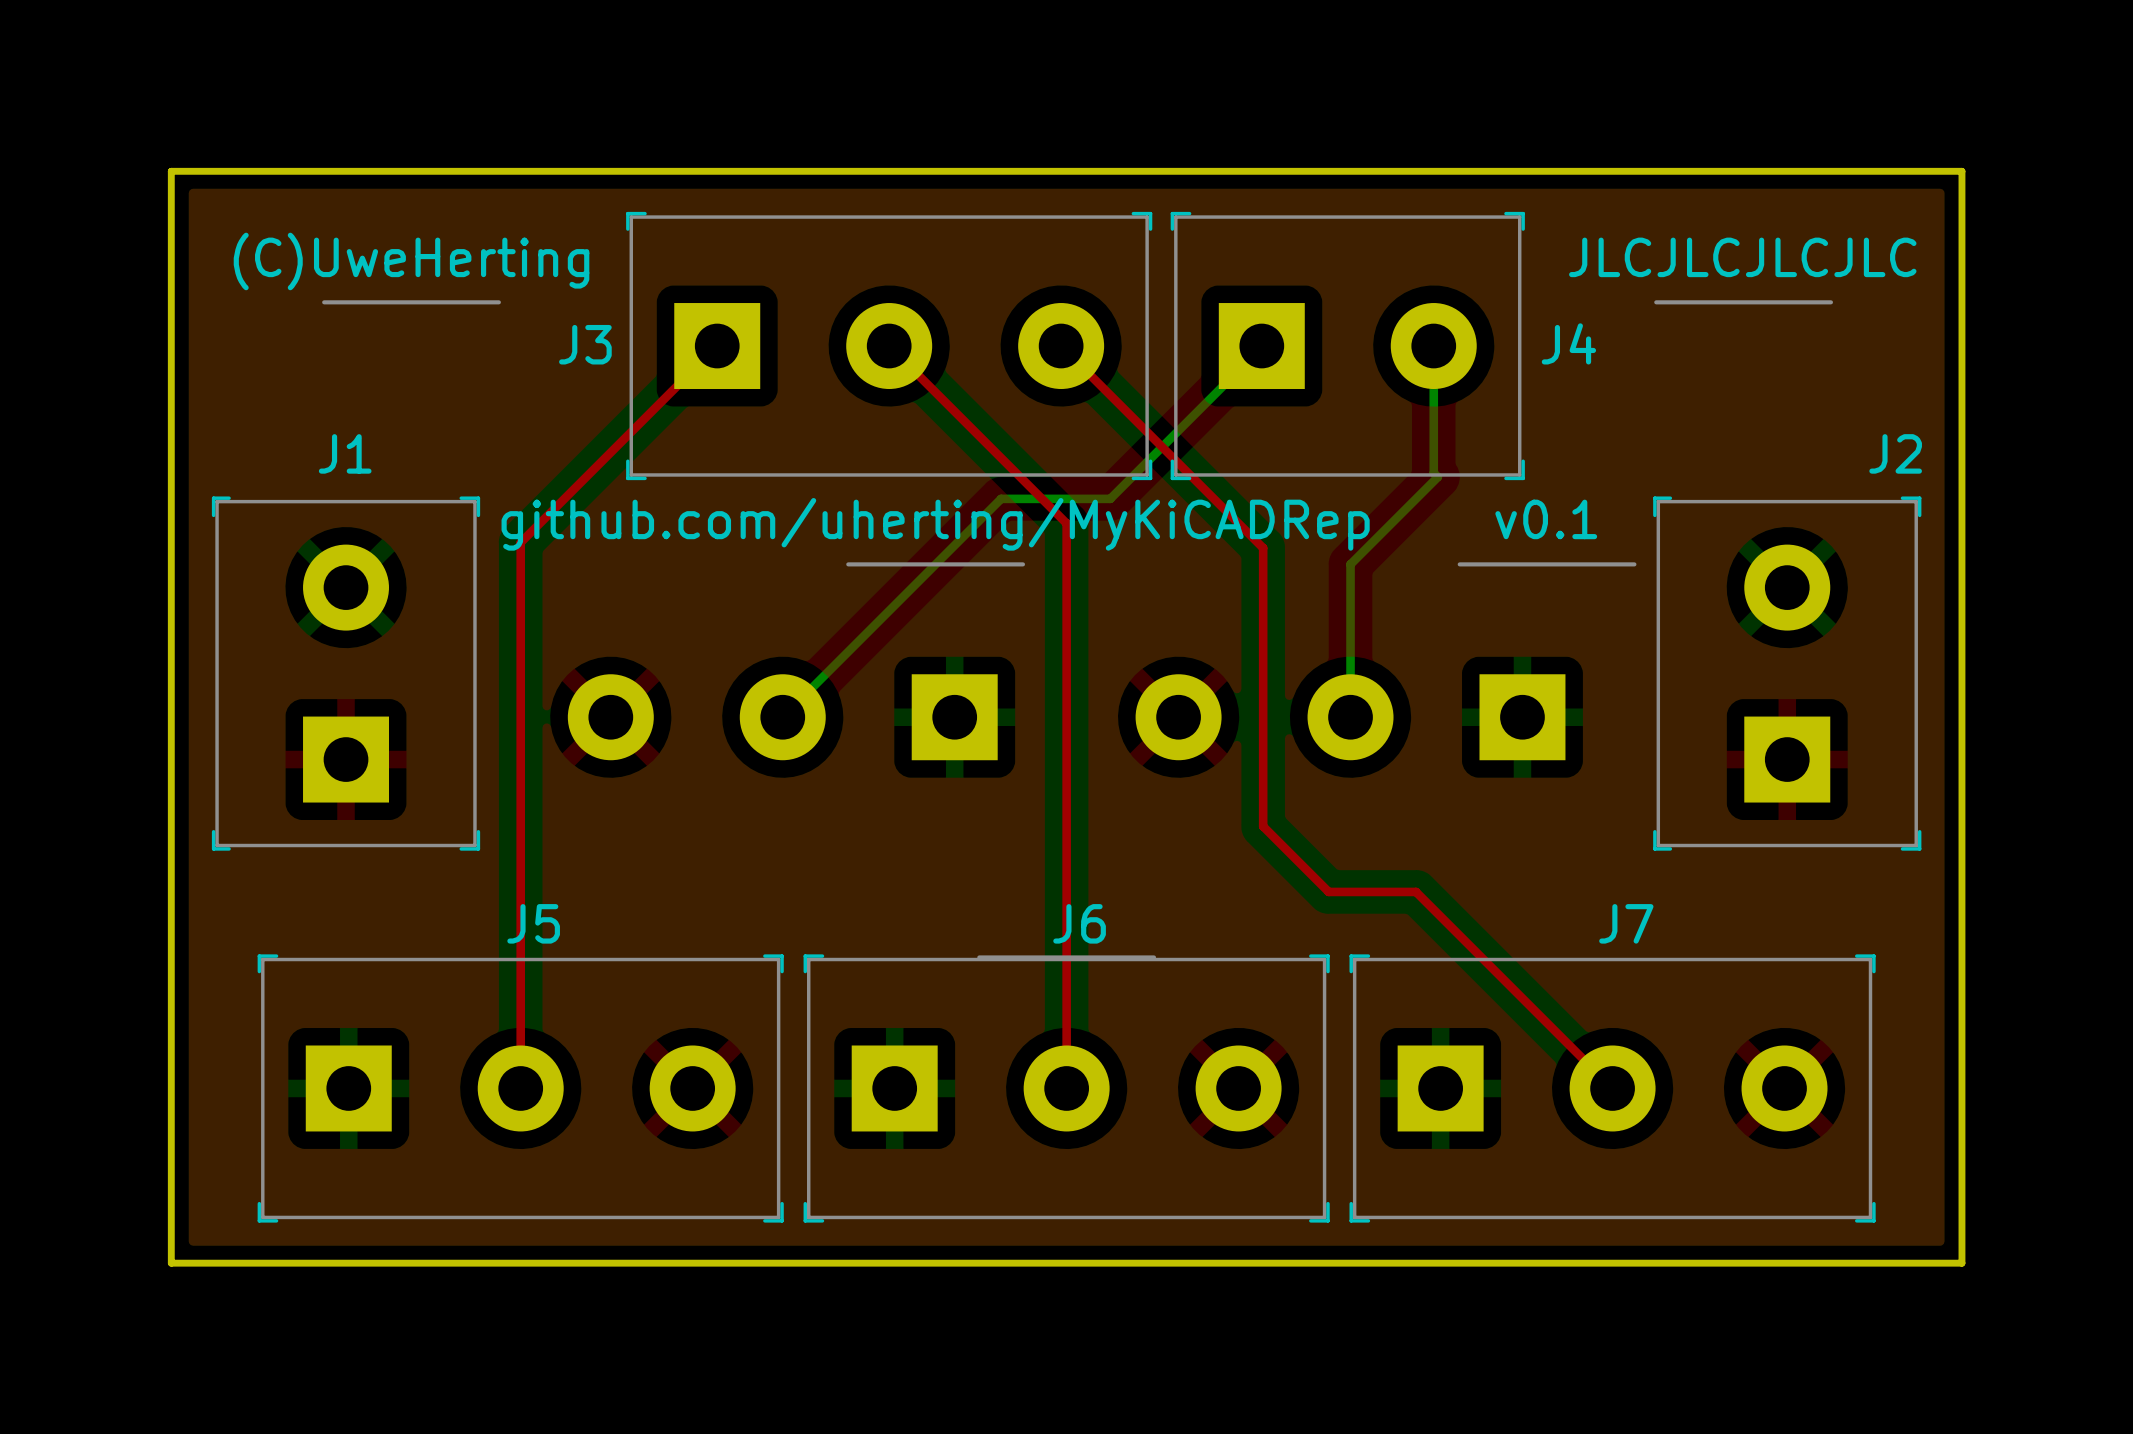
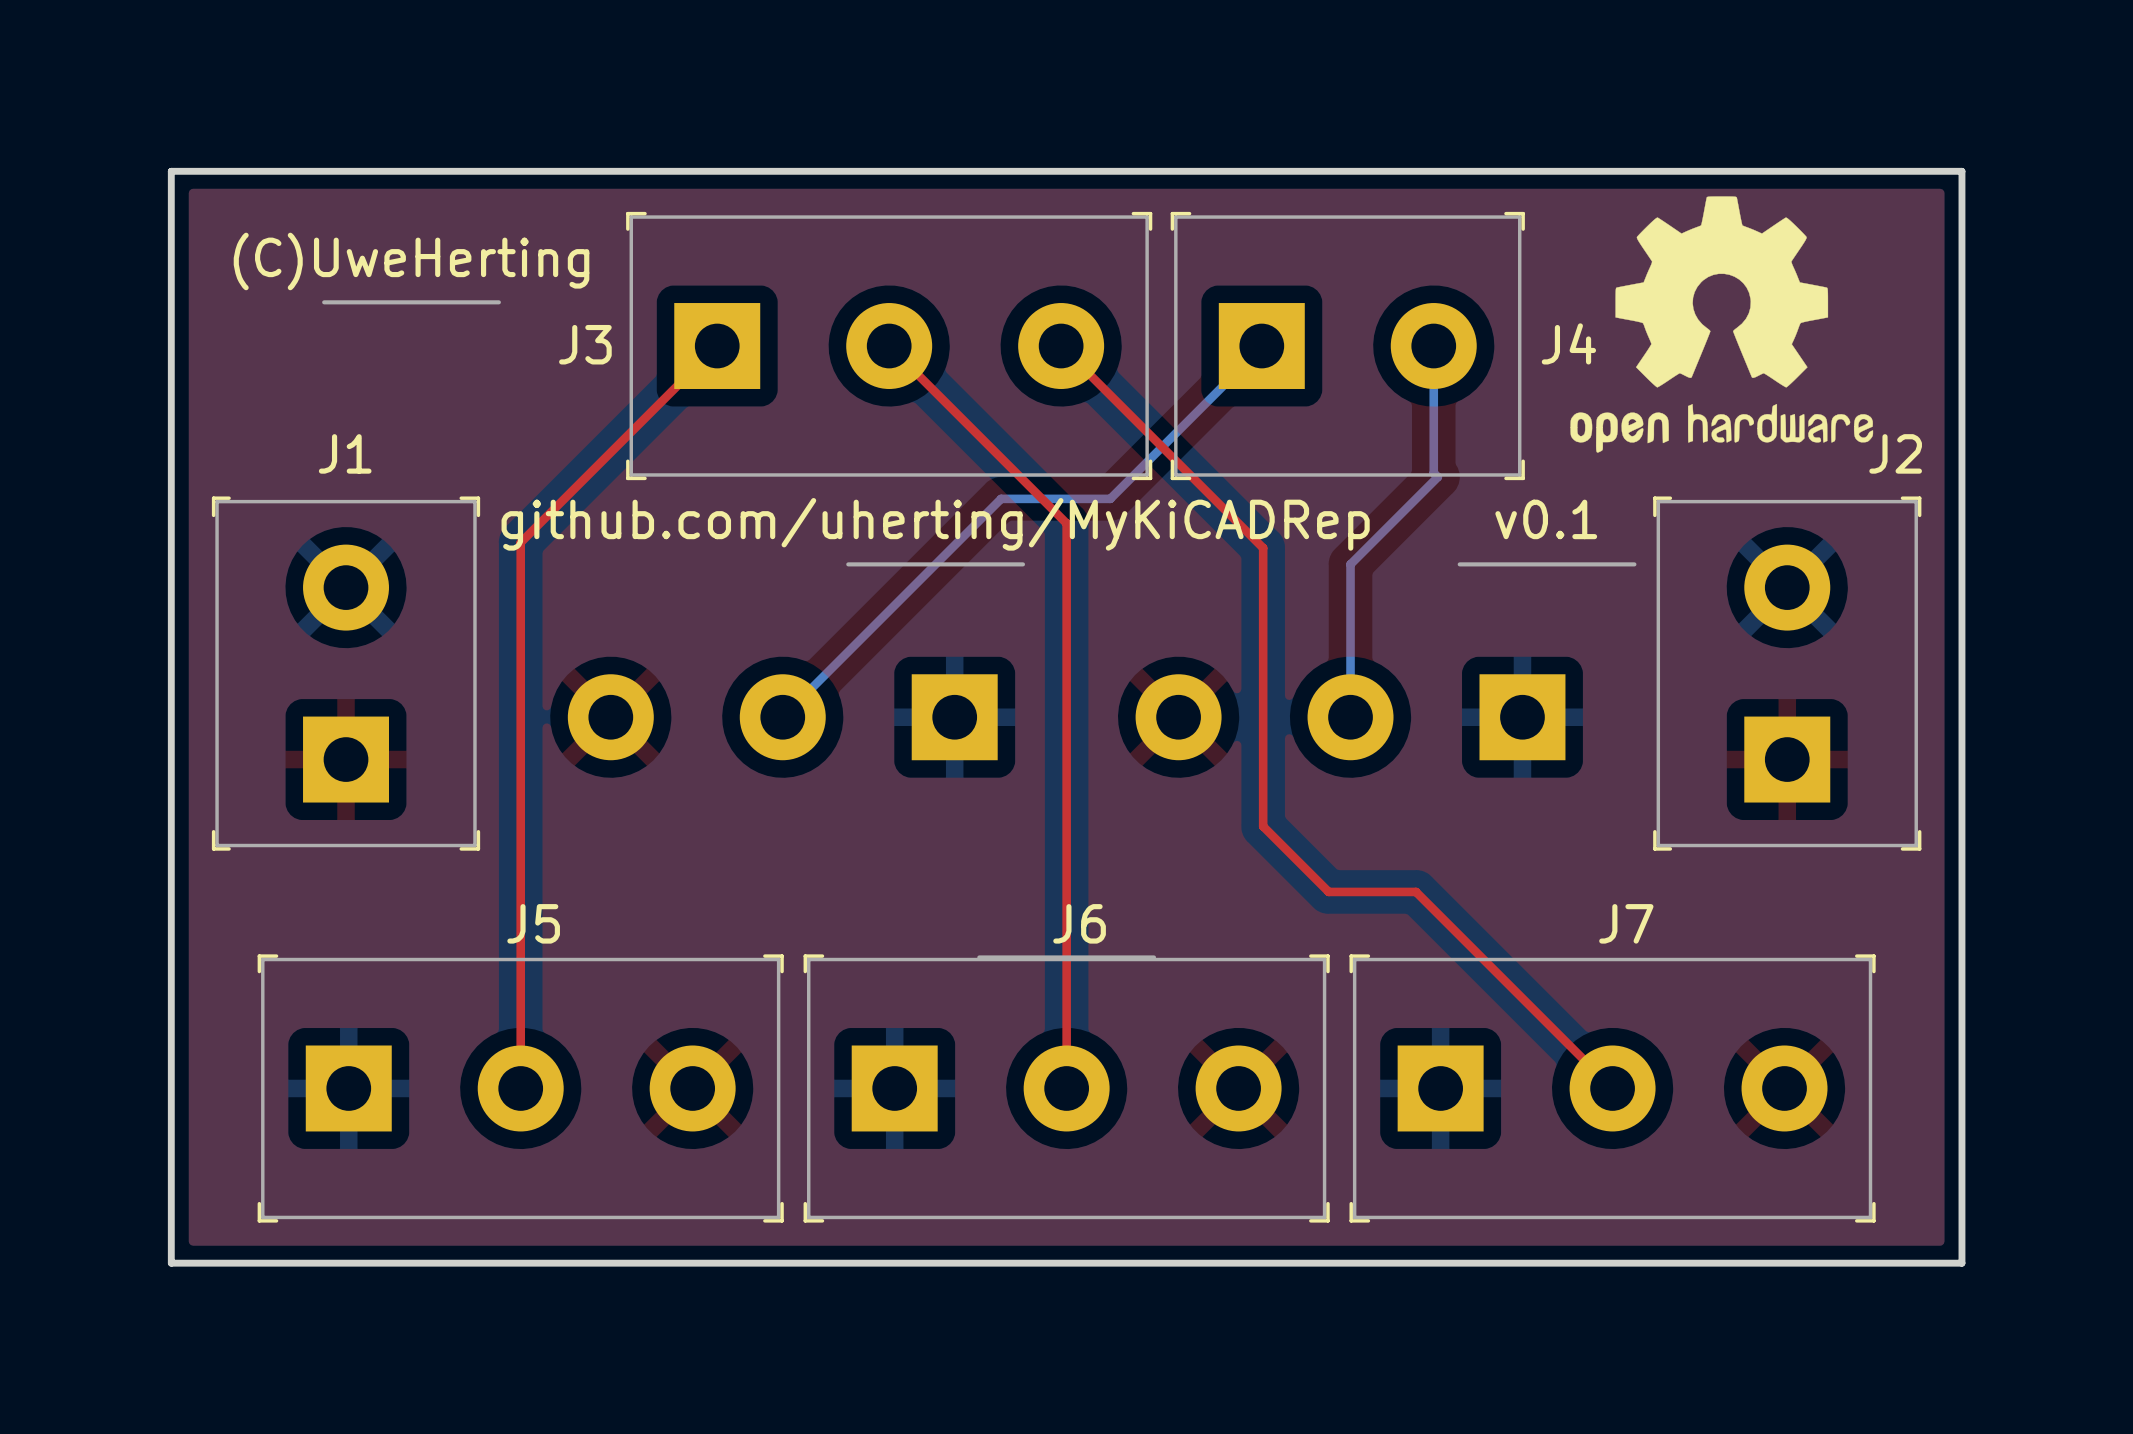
drawing shape: [1569, 237, 1917, 305] -> [1570, 196, 1874, 453]

